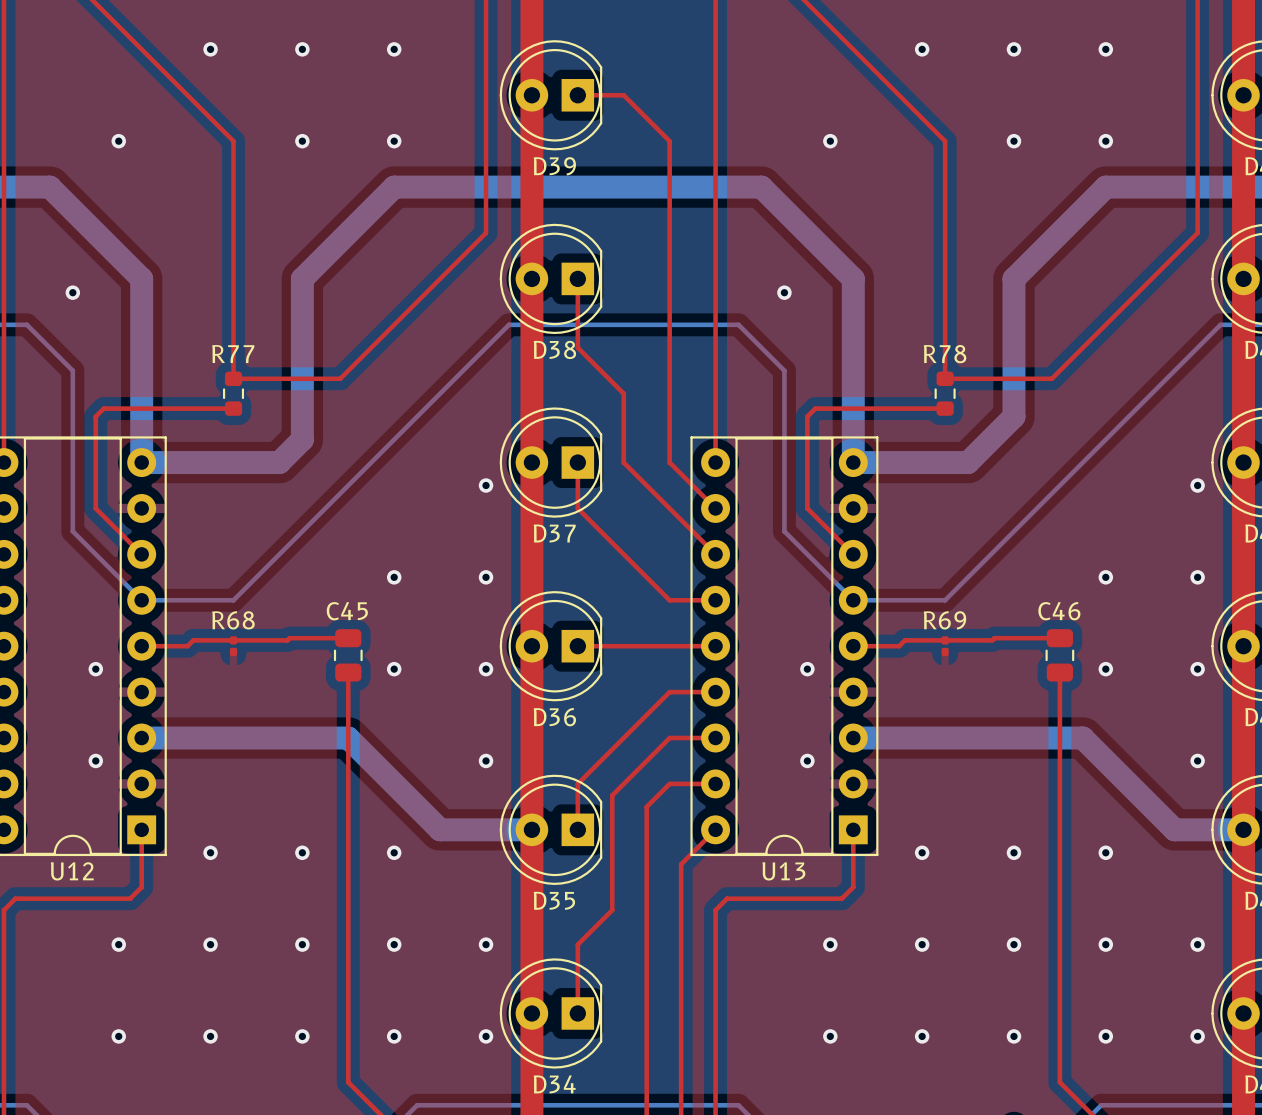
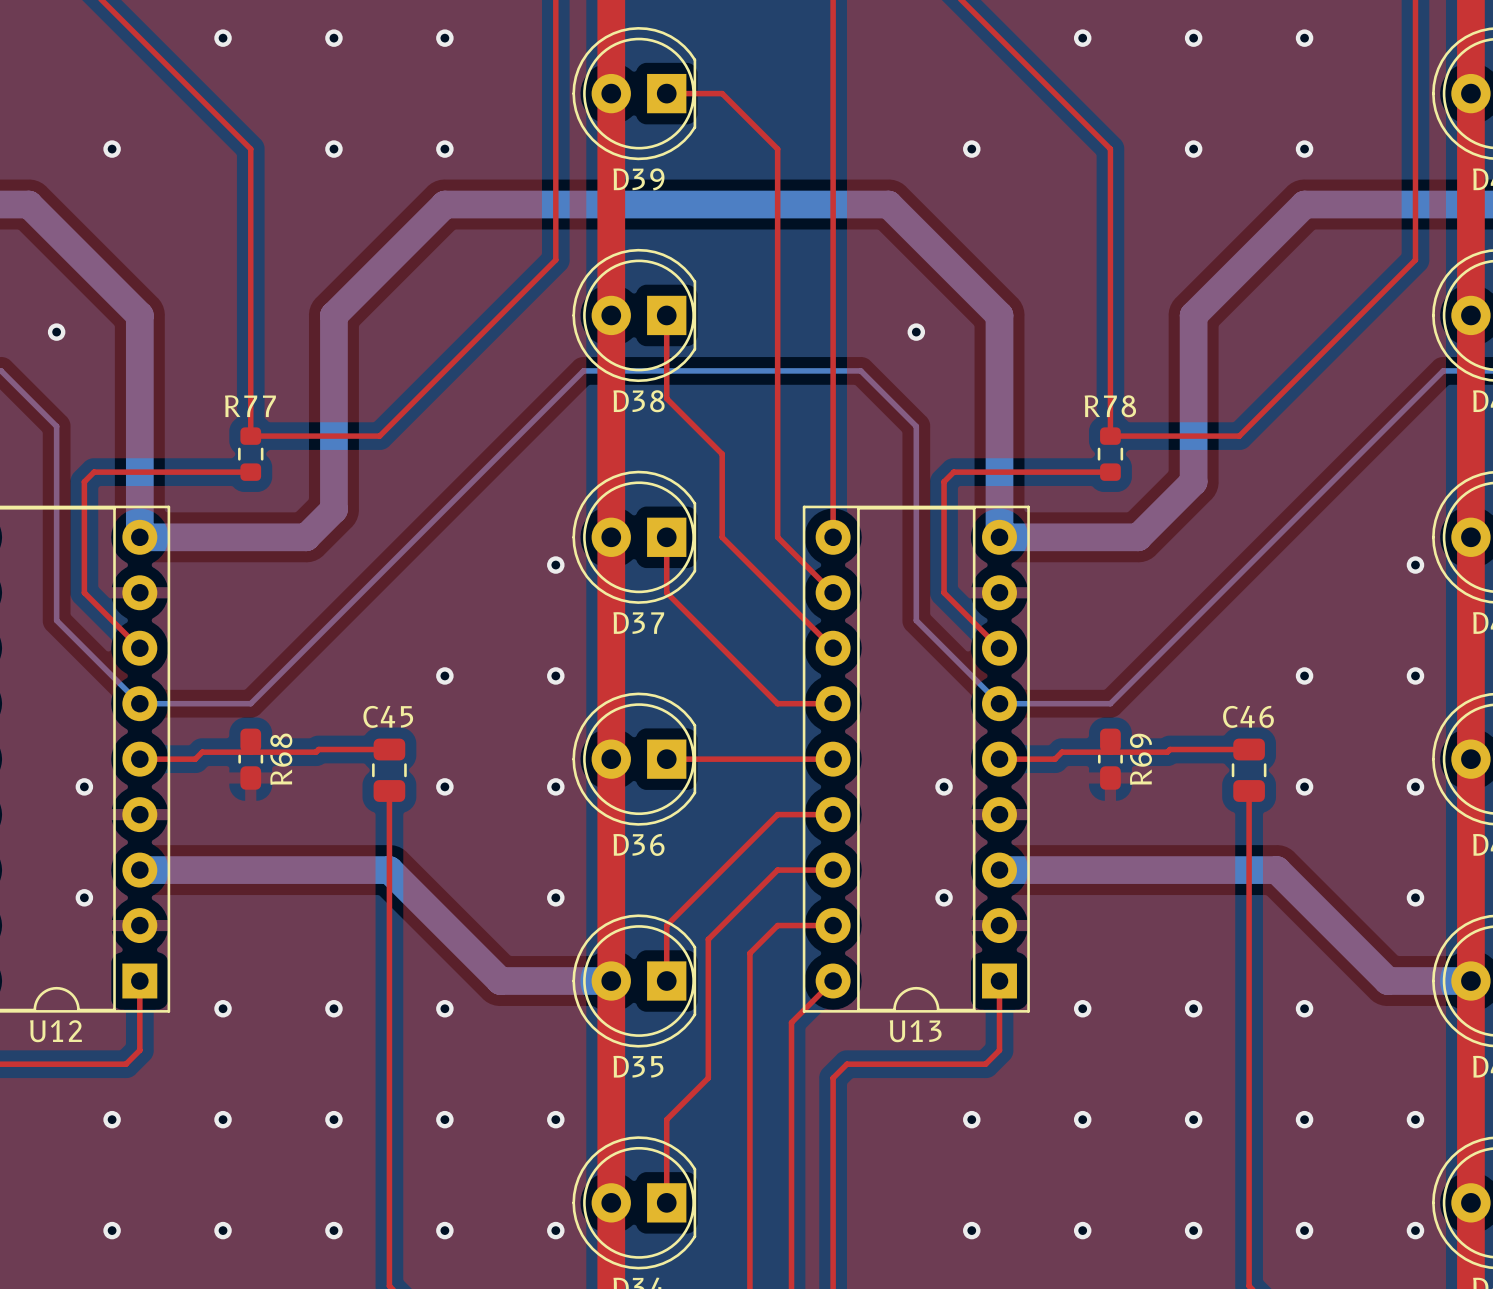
R68 footprint: [229, 636, 238, 657] -> [238, 728, 264, 790]
R69 footprint: [941, 636, 949, 657] -> [1097, 728, 1123, 790]

